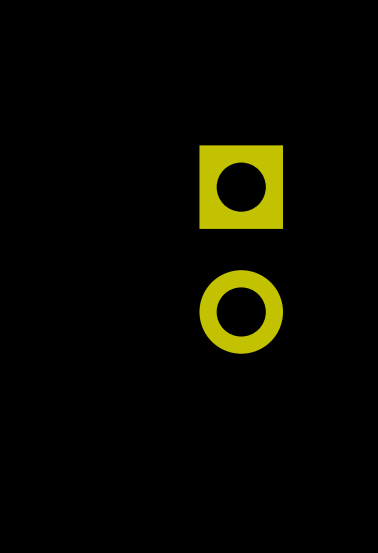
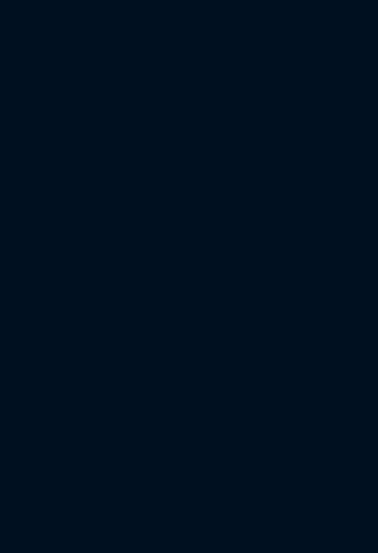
part: (241, 249) -> none

